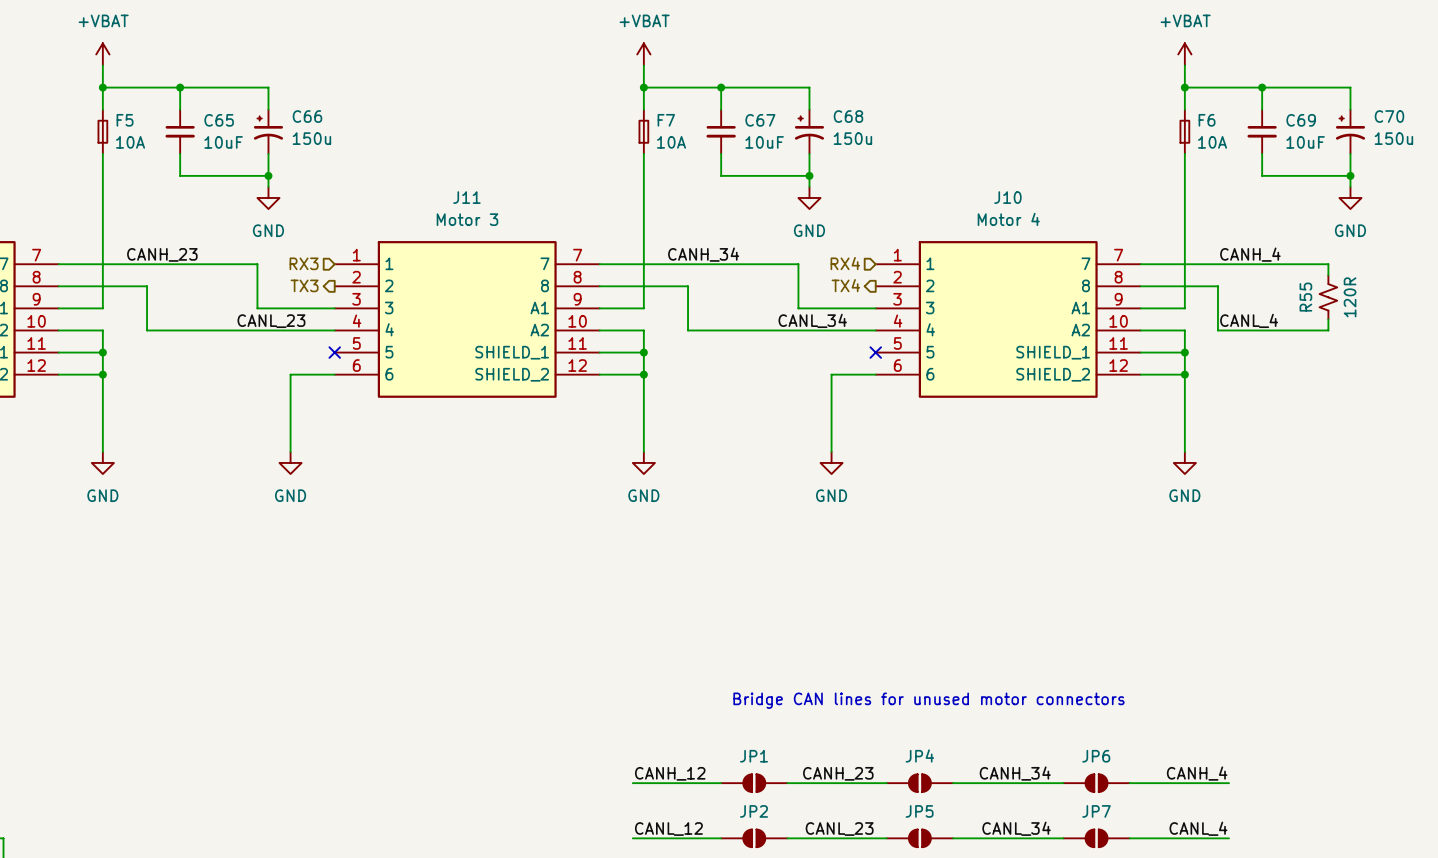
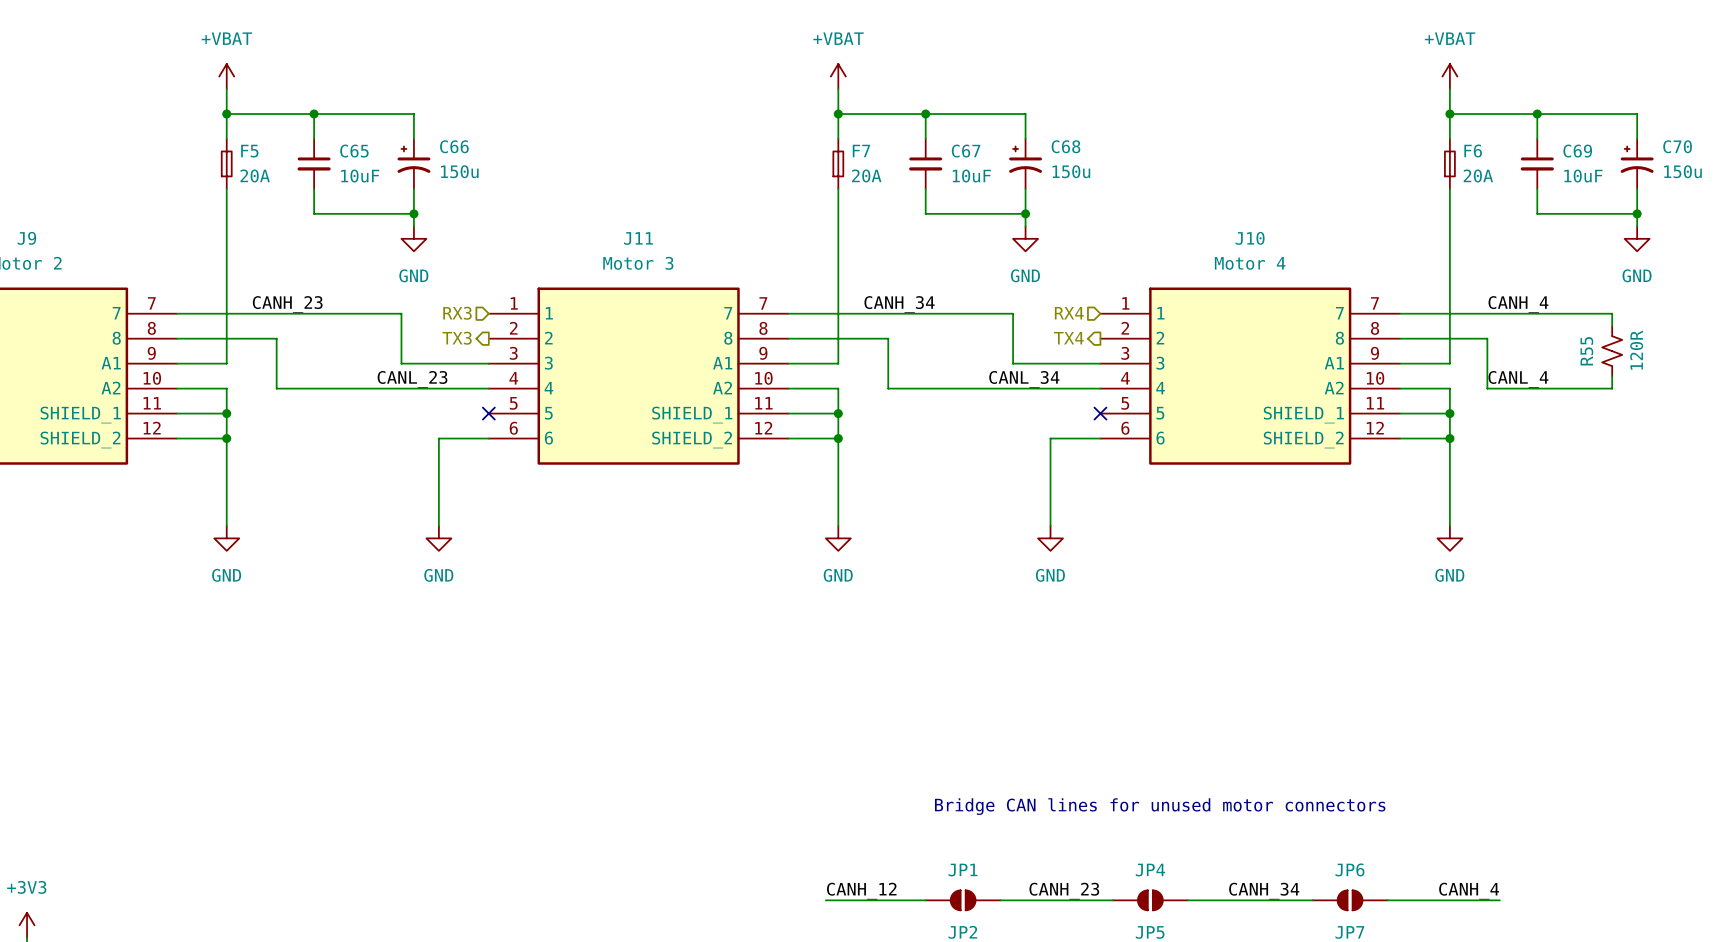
F5 value: 10A (130, 142) -> 20A (255, 175)
F7 value: 10A (671, 142) -> 20A (866, 175)
F6 value: 10A (1212, 142) -> 20A (1478, 175)

